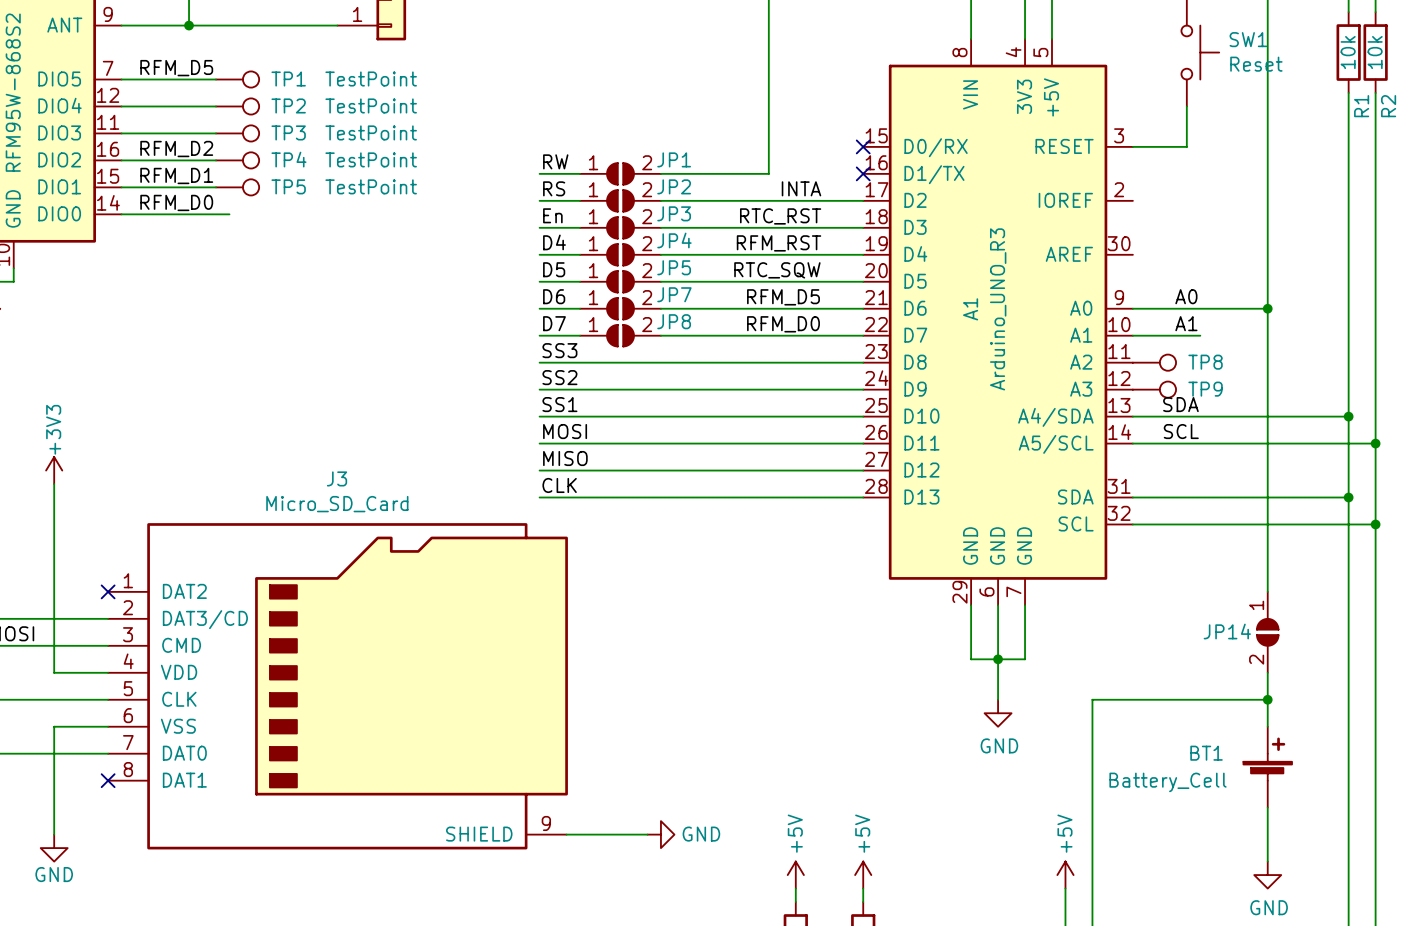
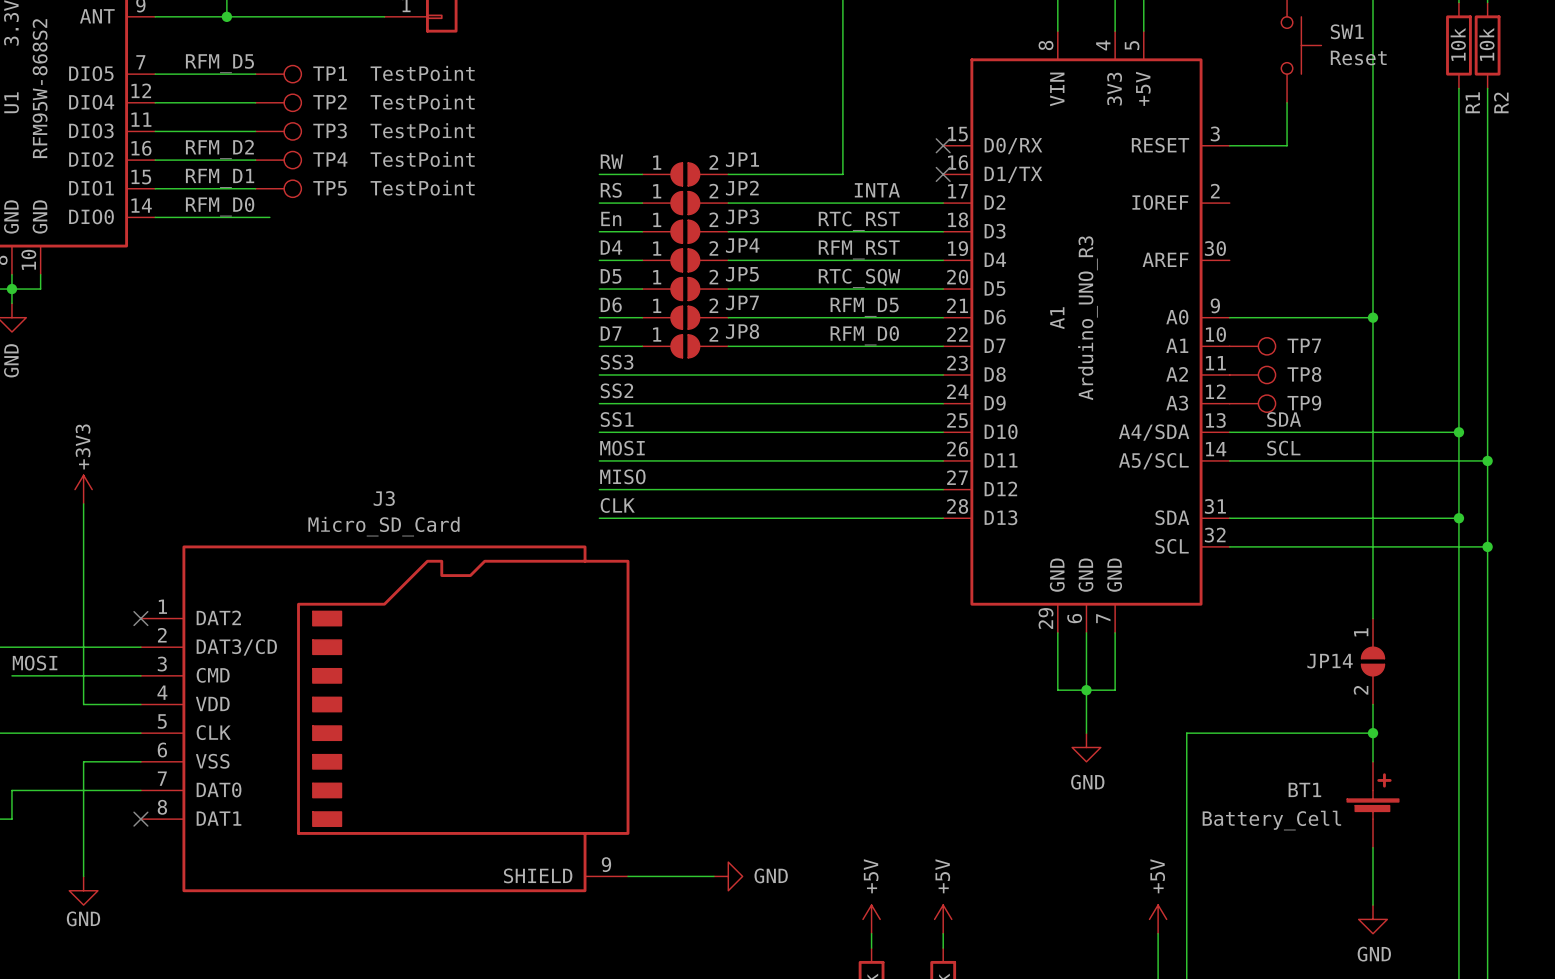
label: A0 (1186, 296) -> none
label: A1 (1186, 323) -> none
wire: (1132, 335) (1200, 335) -> none
TP7: none -> (1252, 346)

